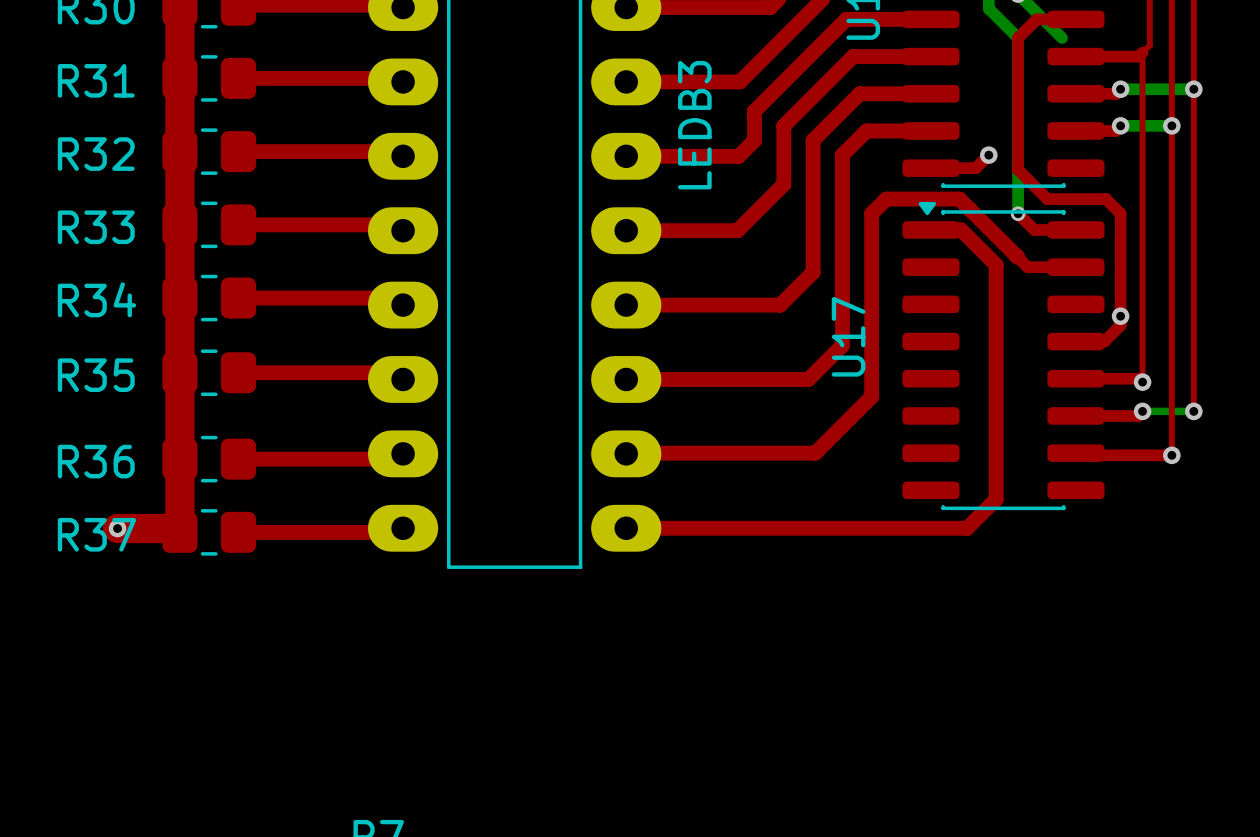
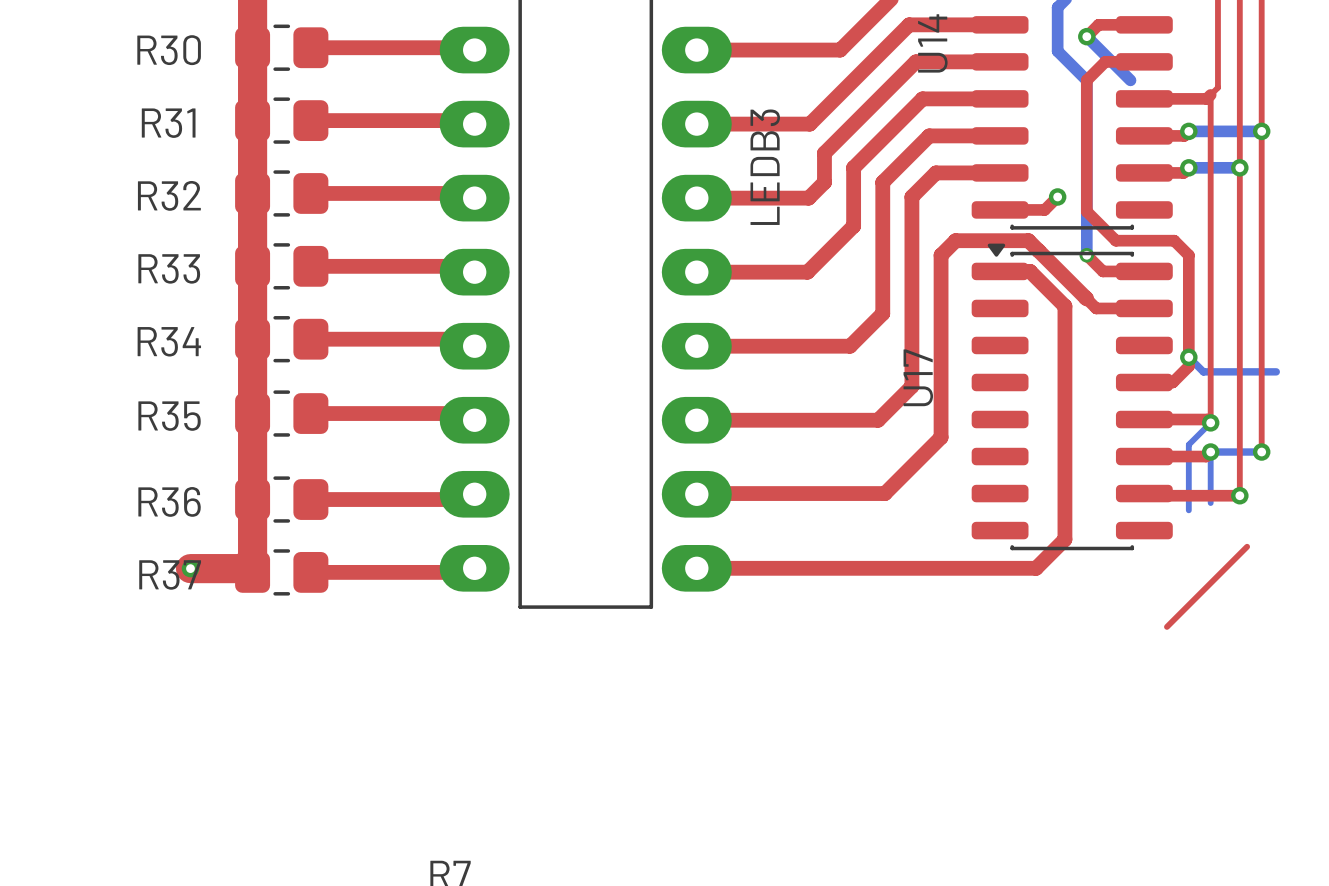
bottom track: none -> (1188, 357) (1203, 371) (1276, 371)
bottom track: none -> (1210, 422) (1188, 444) (1188, 510)
bottom track: none -> (1210, 452) (1210, 503)
top track: none -> (1247, 546) (1166, 626)

